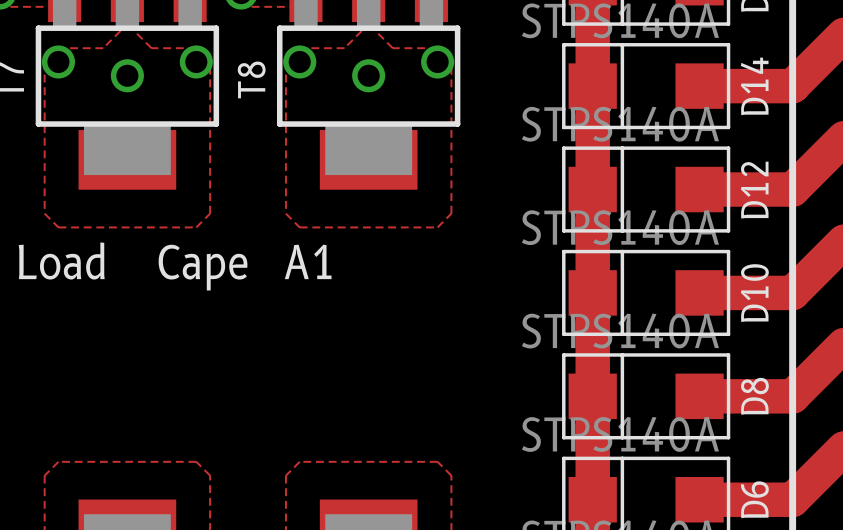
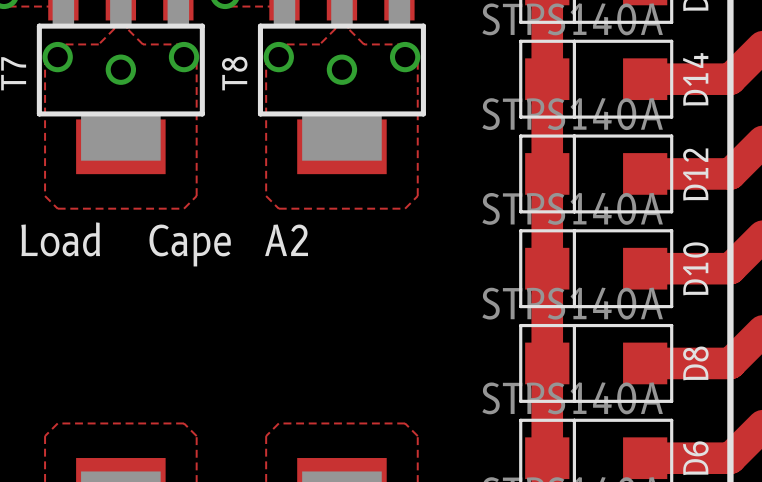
text: A1 (308, 261) -> A2 (286, 240)

